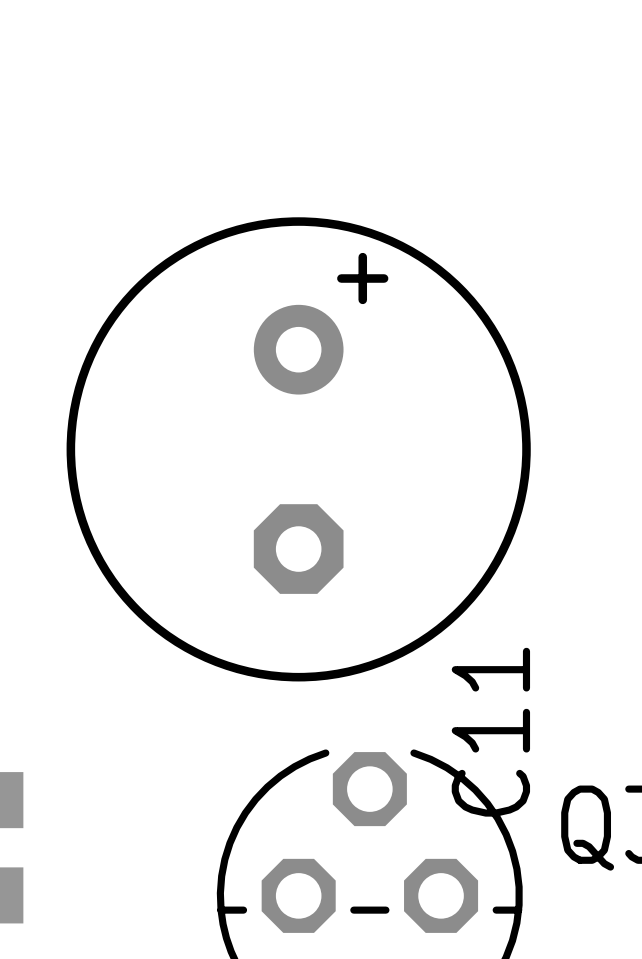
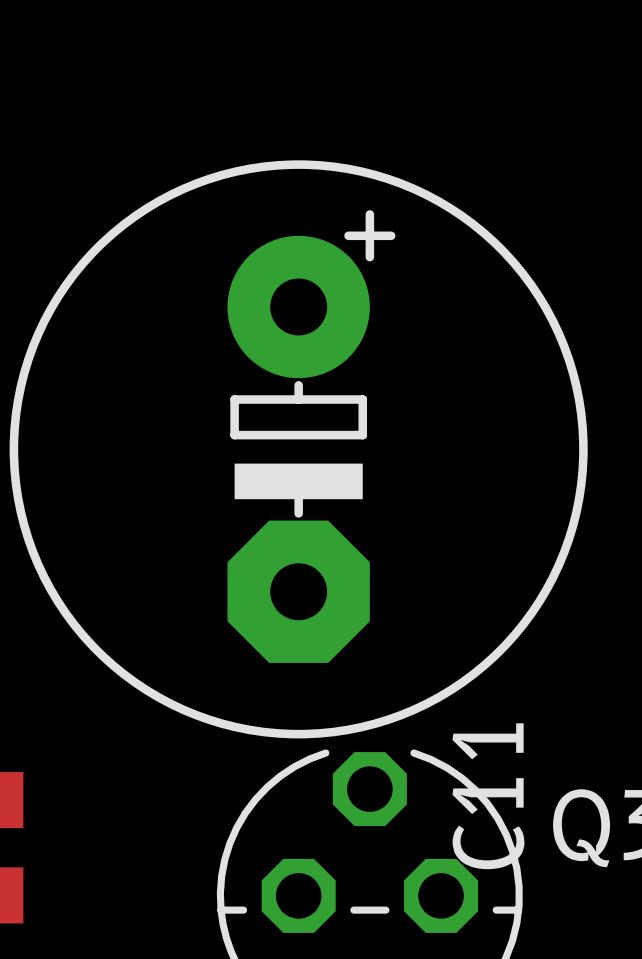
C11 footprint: [66, 217, 531, 682] -> [9, 160, 588, 739]

